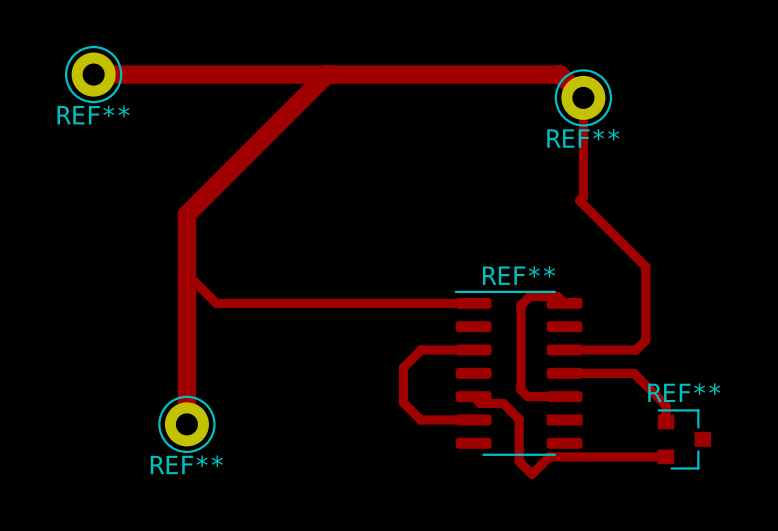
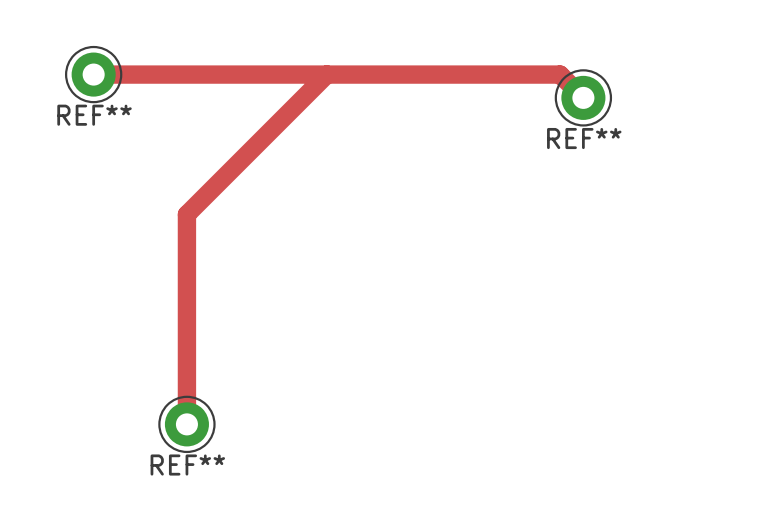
top track: (583, 97) (583, 197) (579, 200) (645, 266) (645, 340) (636, 350) (564, 350) -> none
top track: (186, 273) (216, 303) (473, 303) -> none
top track: (564, 303) (557, 296) (529, 296) (520, 305) (520, 389) (527, 396) (564, 396) -> none
top track: (473, 350) (421, 350) (403, 367) (403, 402) (420, 419) (473, 419) -> none
REF**: (518, 373) -> none
top track: (564, 373) (633, 373) (666, 405) (666, 422) -> none
top track: (473, 396) (480, 403) (503, 403) (519, 419) (519, 461) (531, 474) (549, 456) (666, 456) -> none
REF**: (684, 439) -> none

